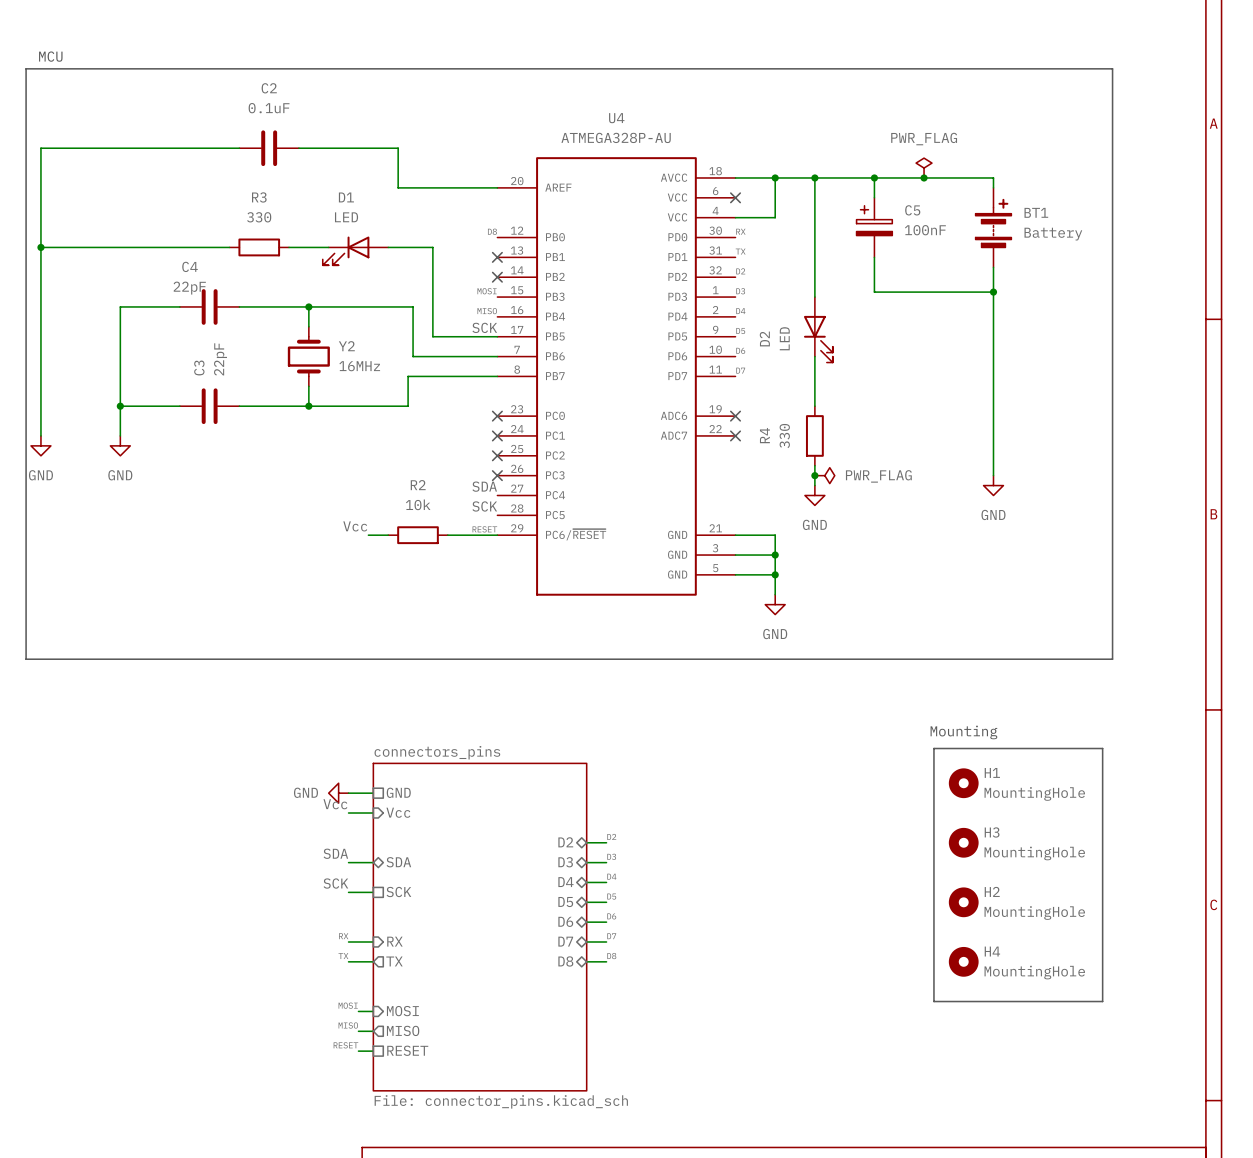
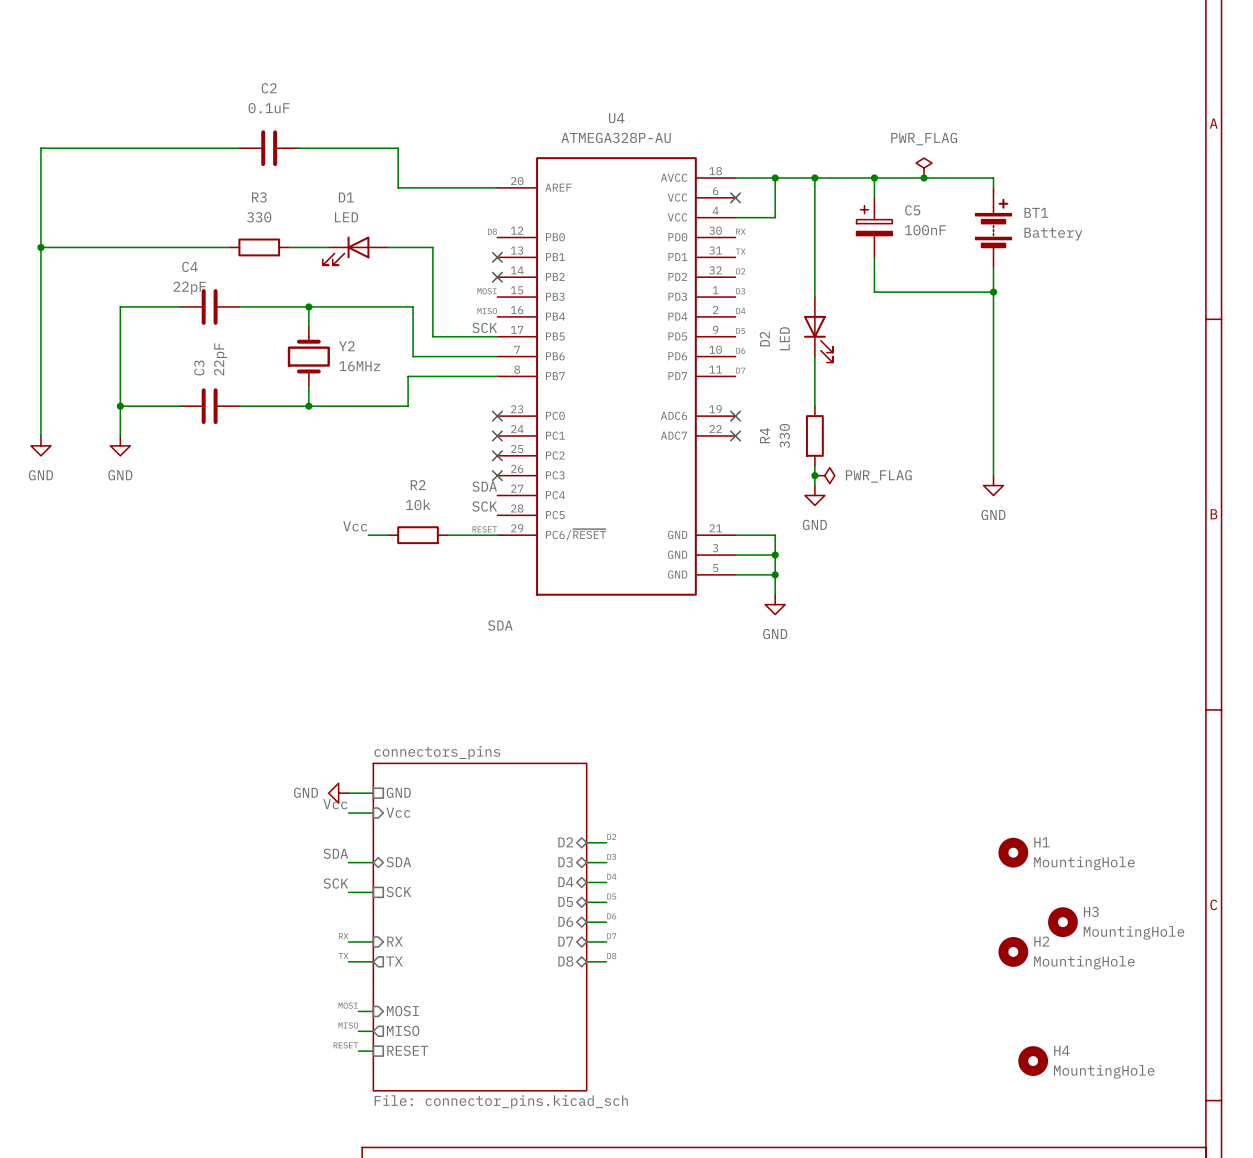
text: MCU (50, 56) -> none
line: (26, 68) (1112, 68) (1112, 659) (26, 659) (26, 68) -> none
label: none -> SDA (500, 625)
text: Mounting (963, 732) -> none
line: (933, 748) (1102, 748) (1102, 1001) (933, 1001) (933, 748) -> none
H1 position: (963, 783) -> (1013, 852)
H3 position: (963, 842) -> (1062, 922)
H2 position: (963, 902) -> (1013, 951)
H4 position: (963, 961) -> (1033, 1061)

